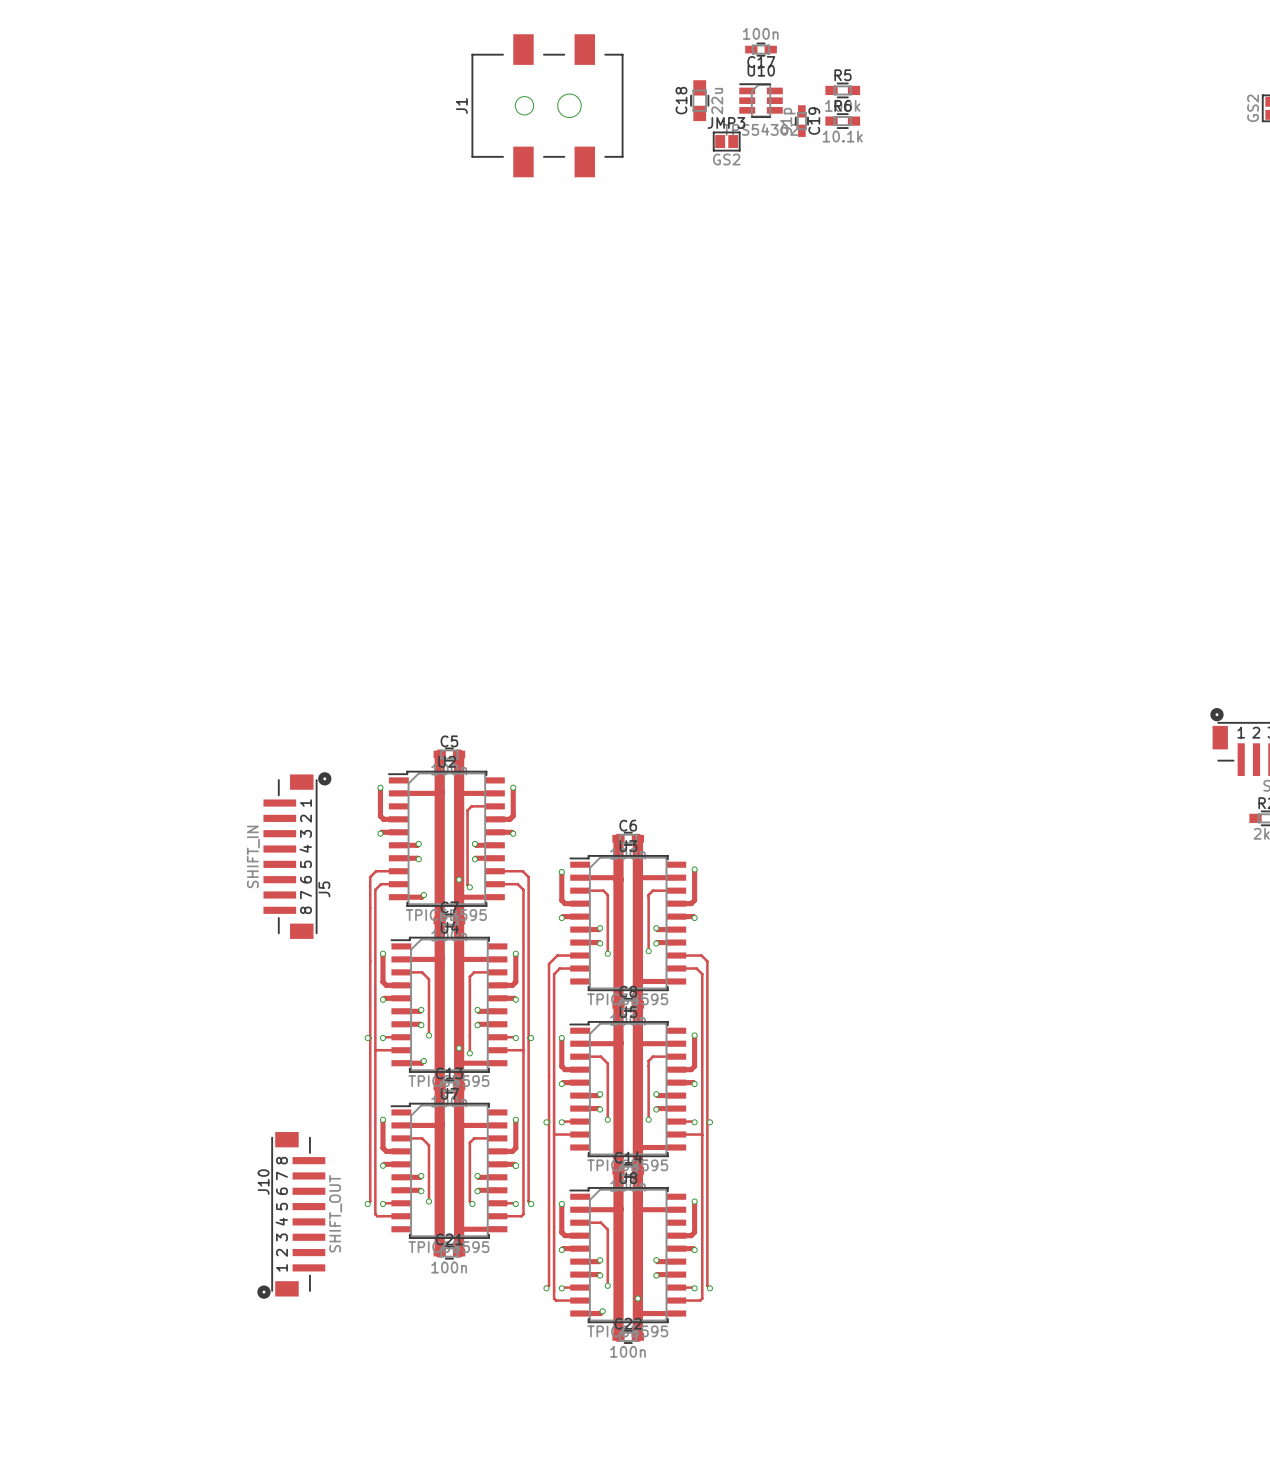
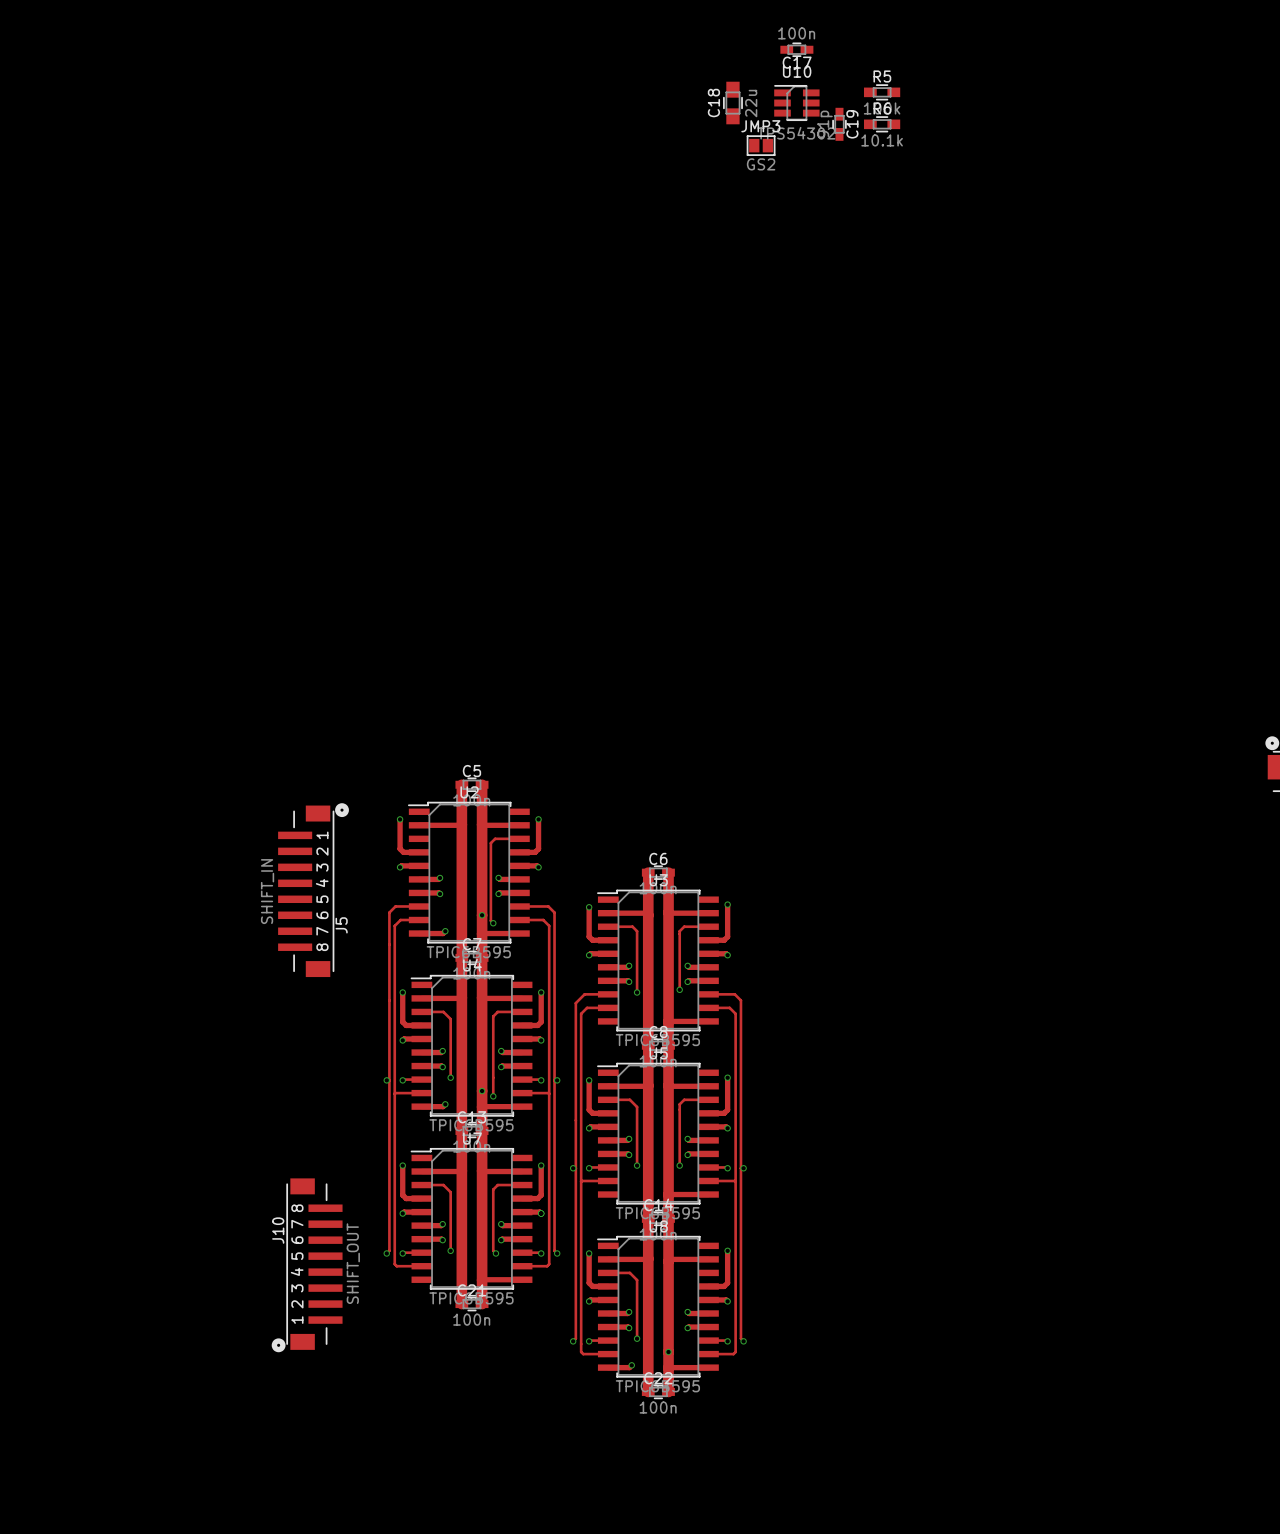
J1: (547, 105) -> none

